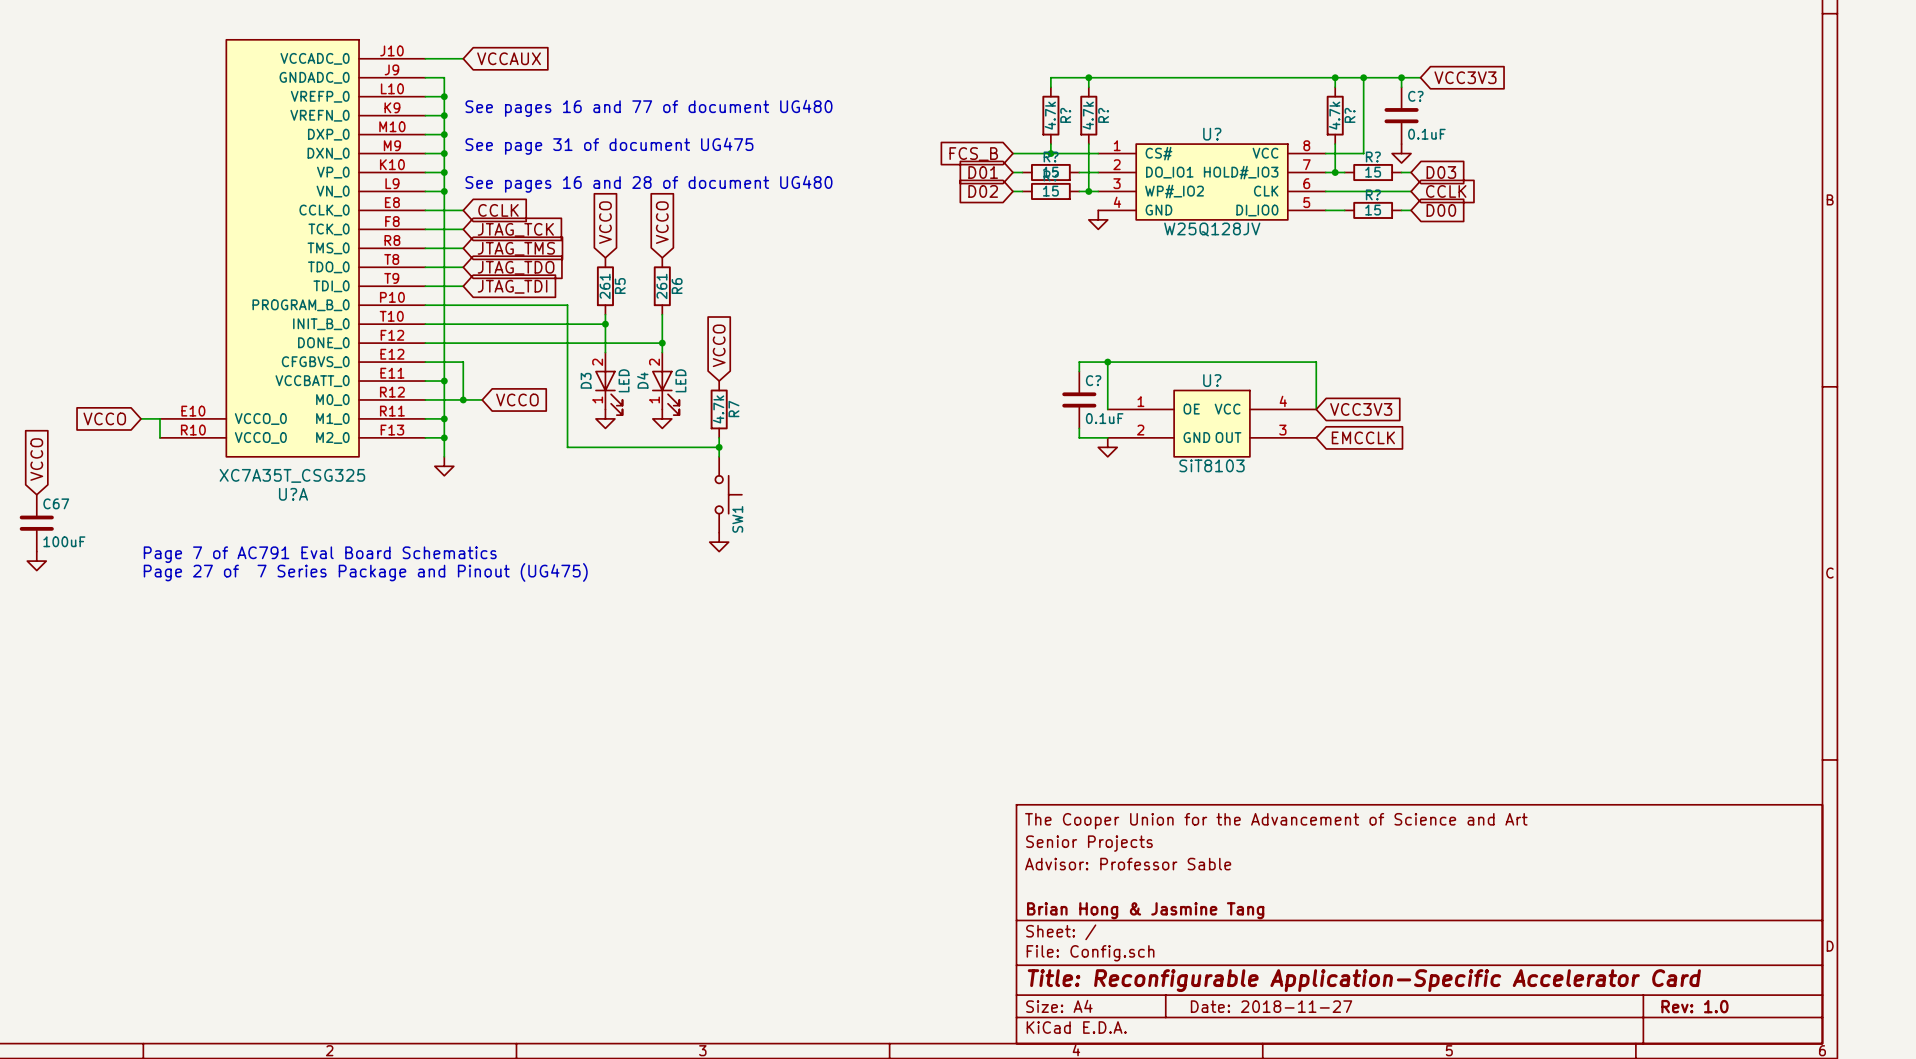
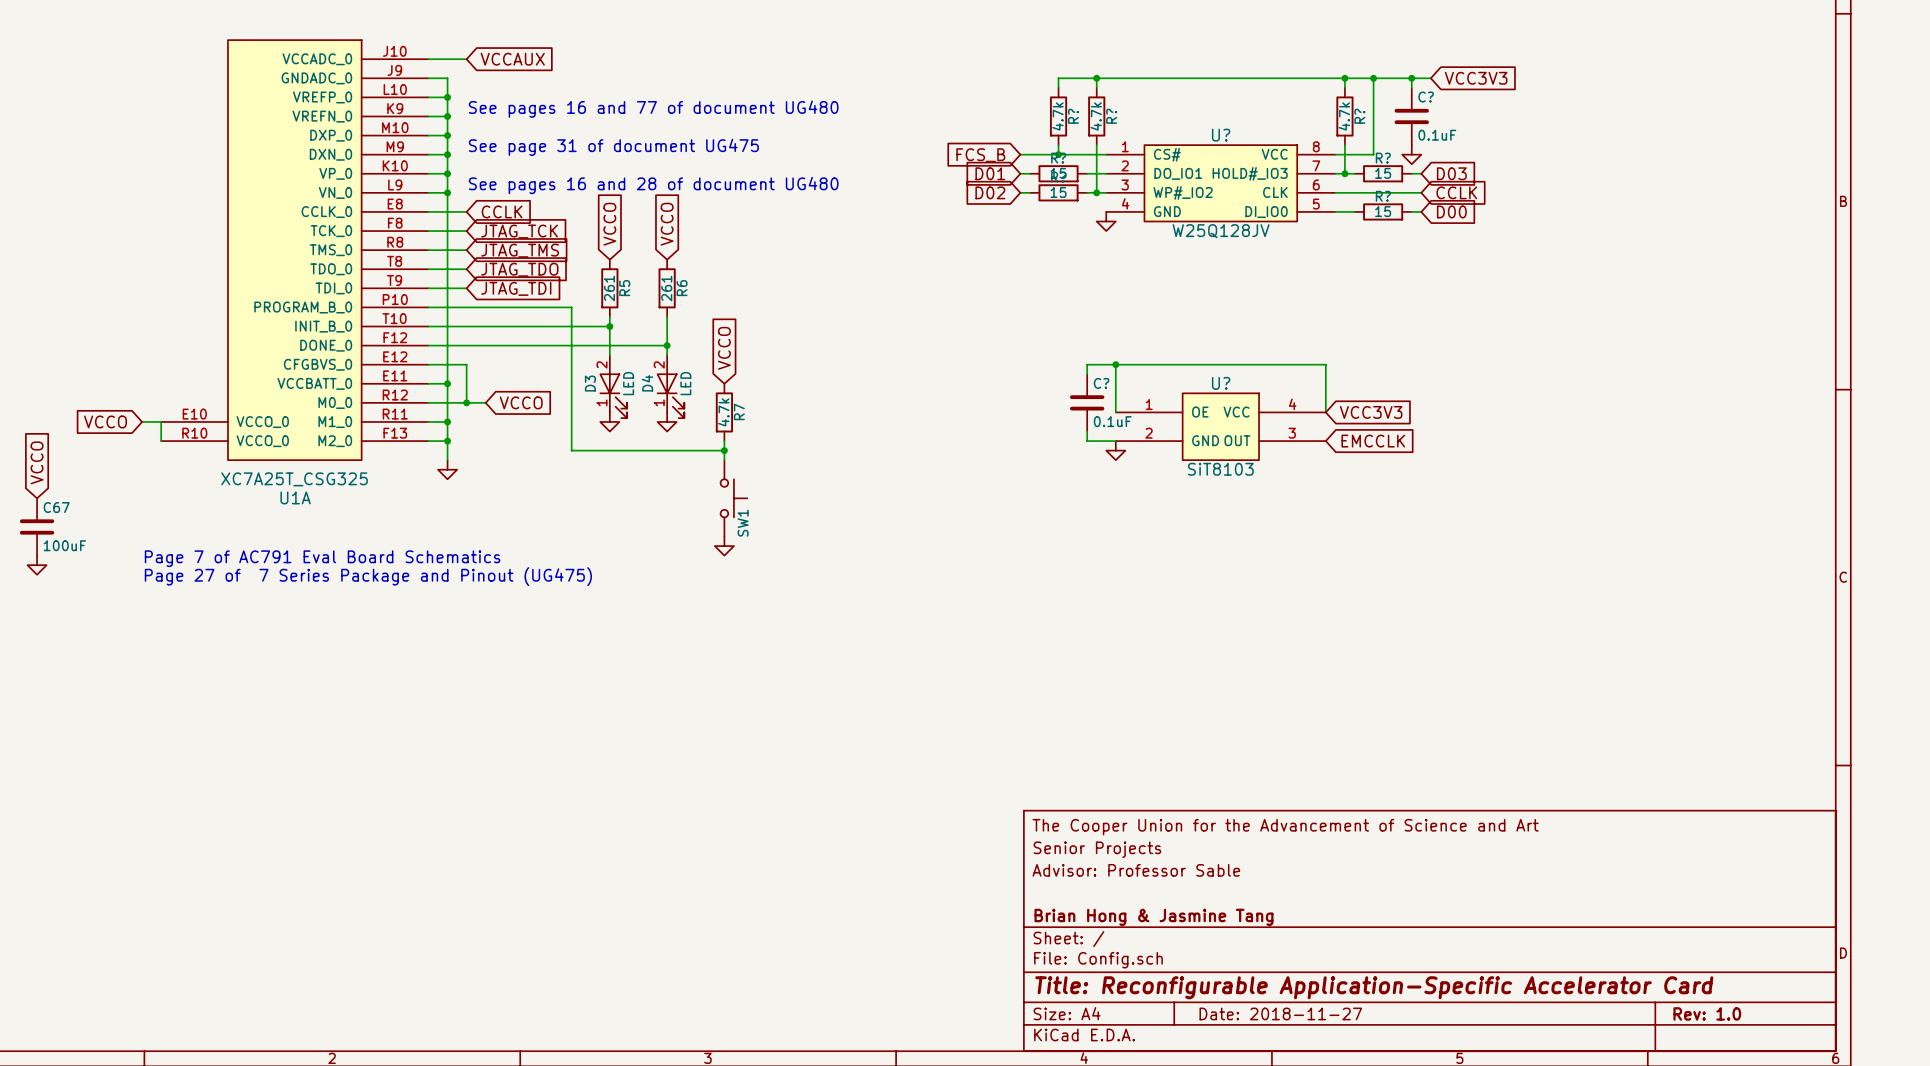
U?A value: XC7A35T_CSG325 (292, 475) -> XC7A25T_CSG325 (294, 479)
U?A name: U?A (293, 494) -> U1A (295, 497)

